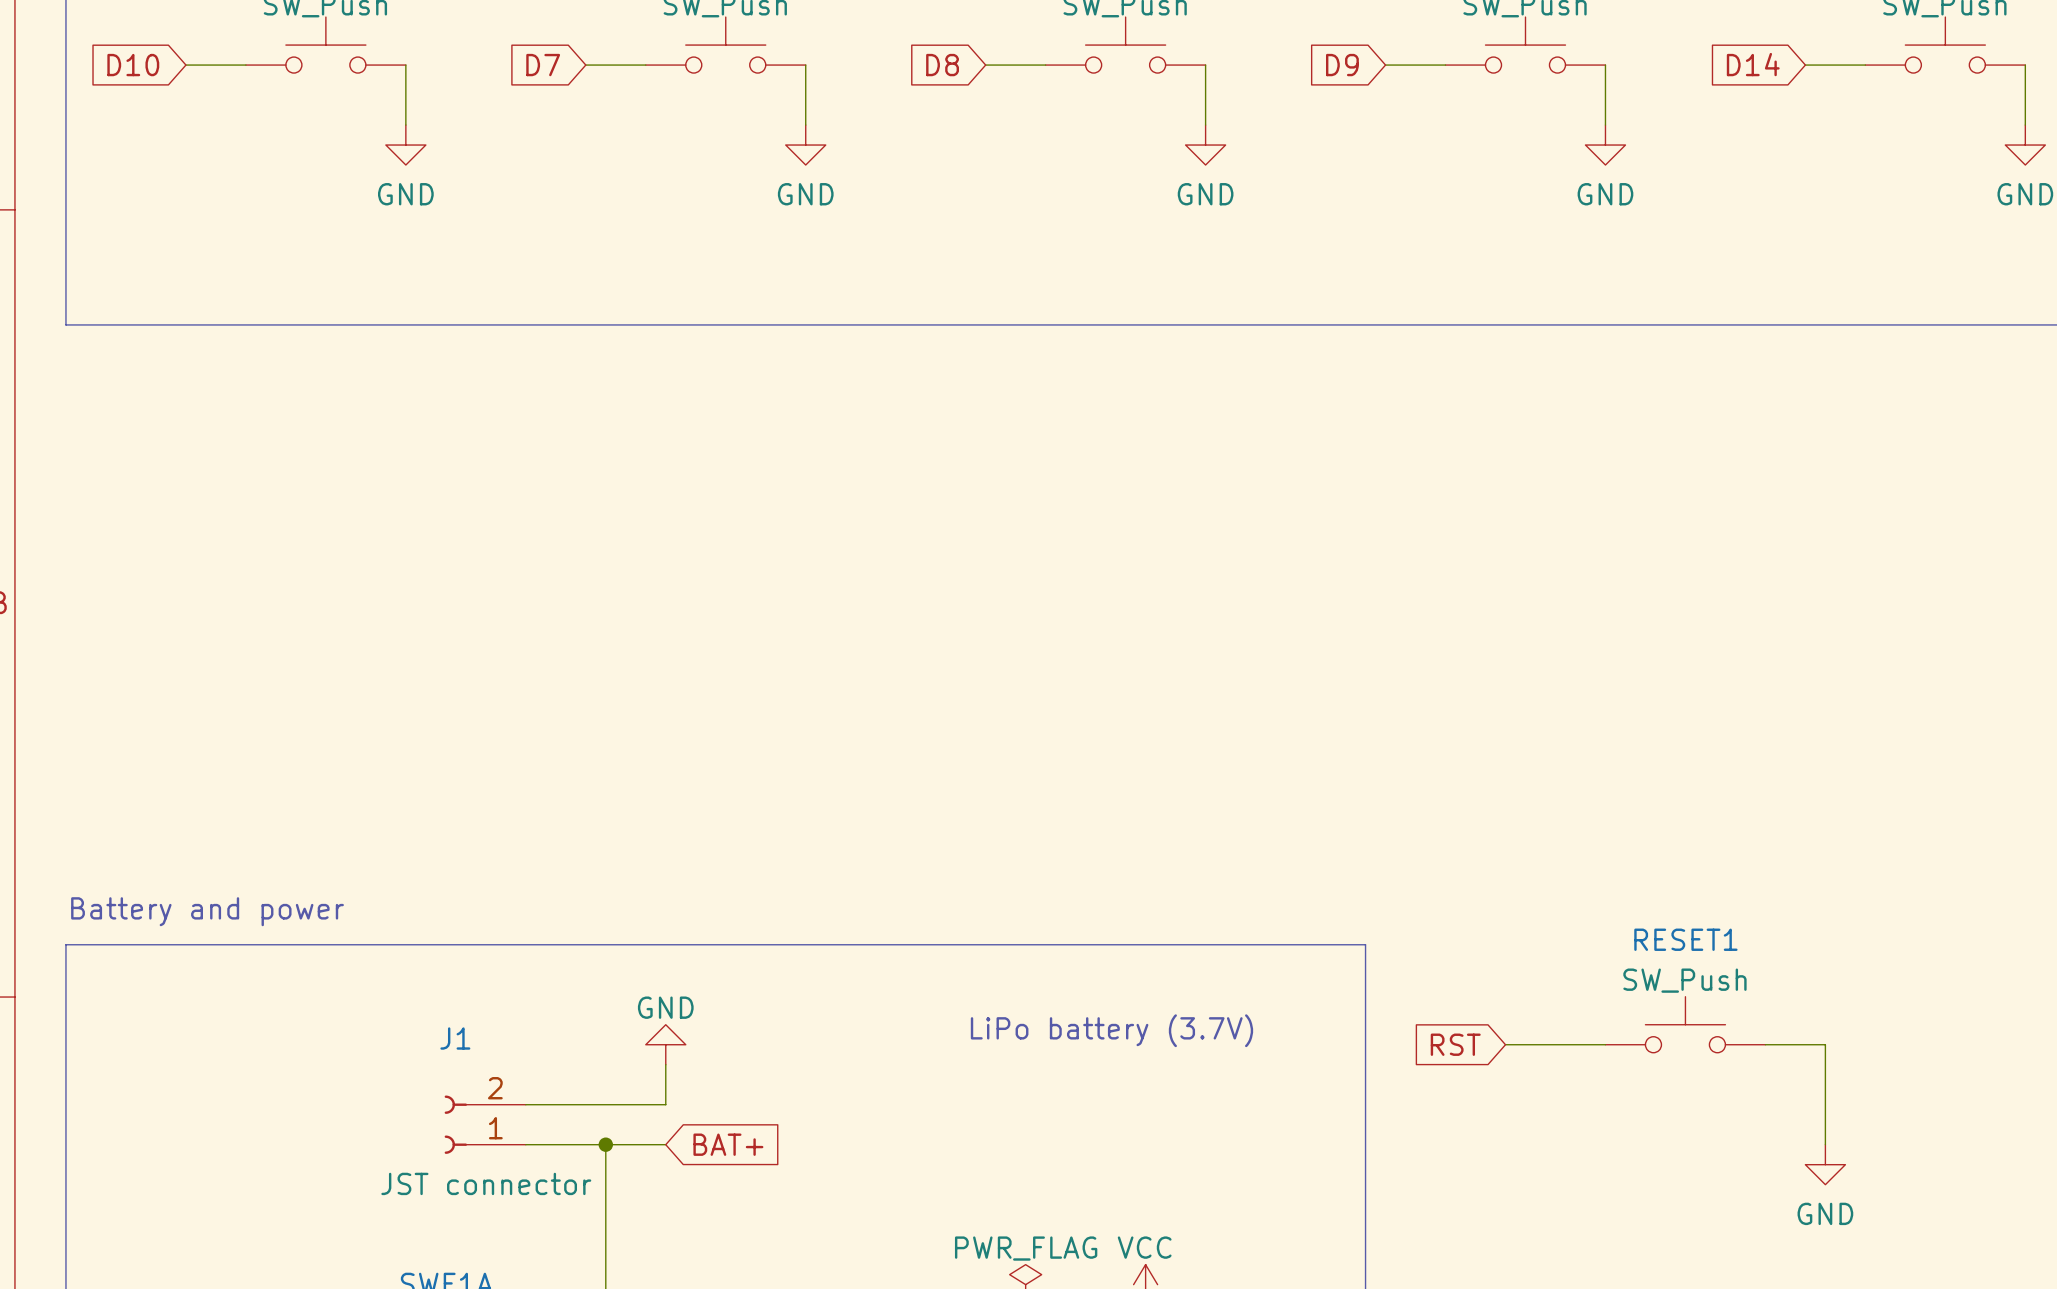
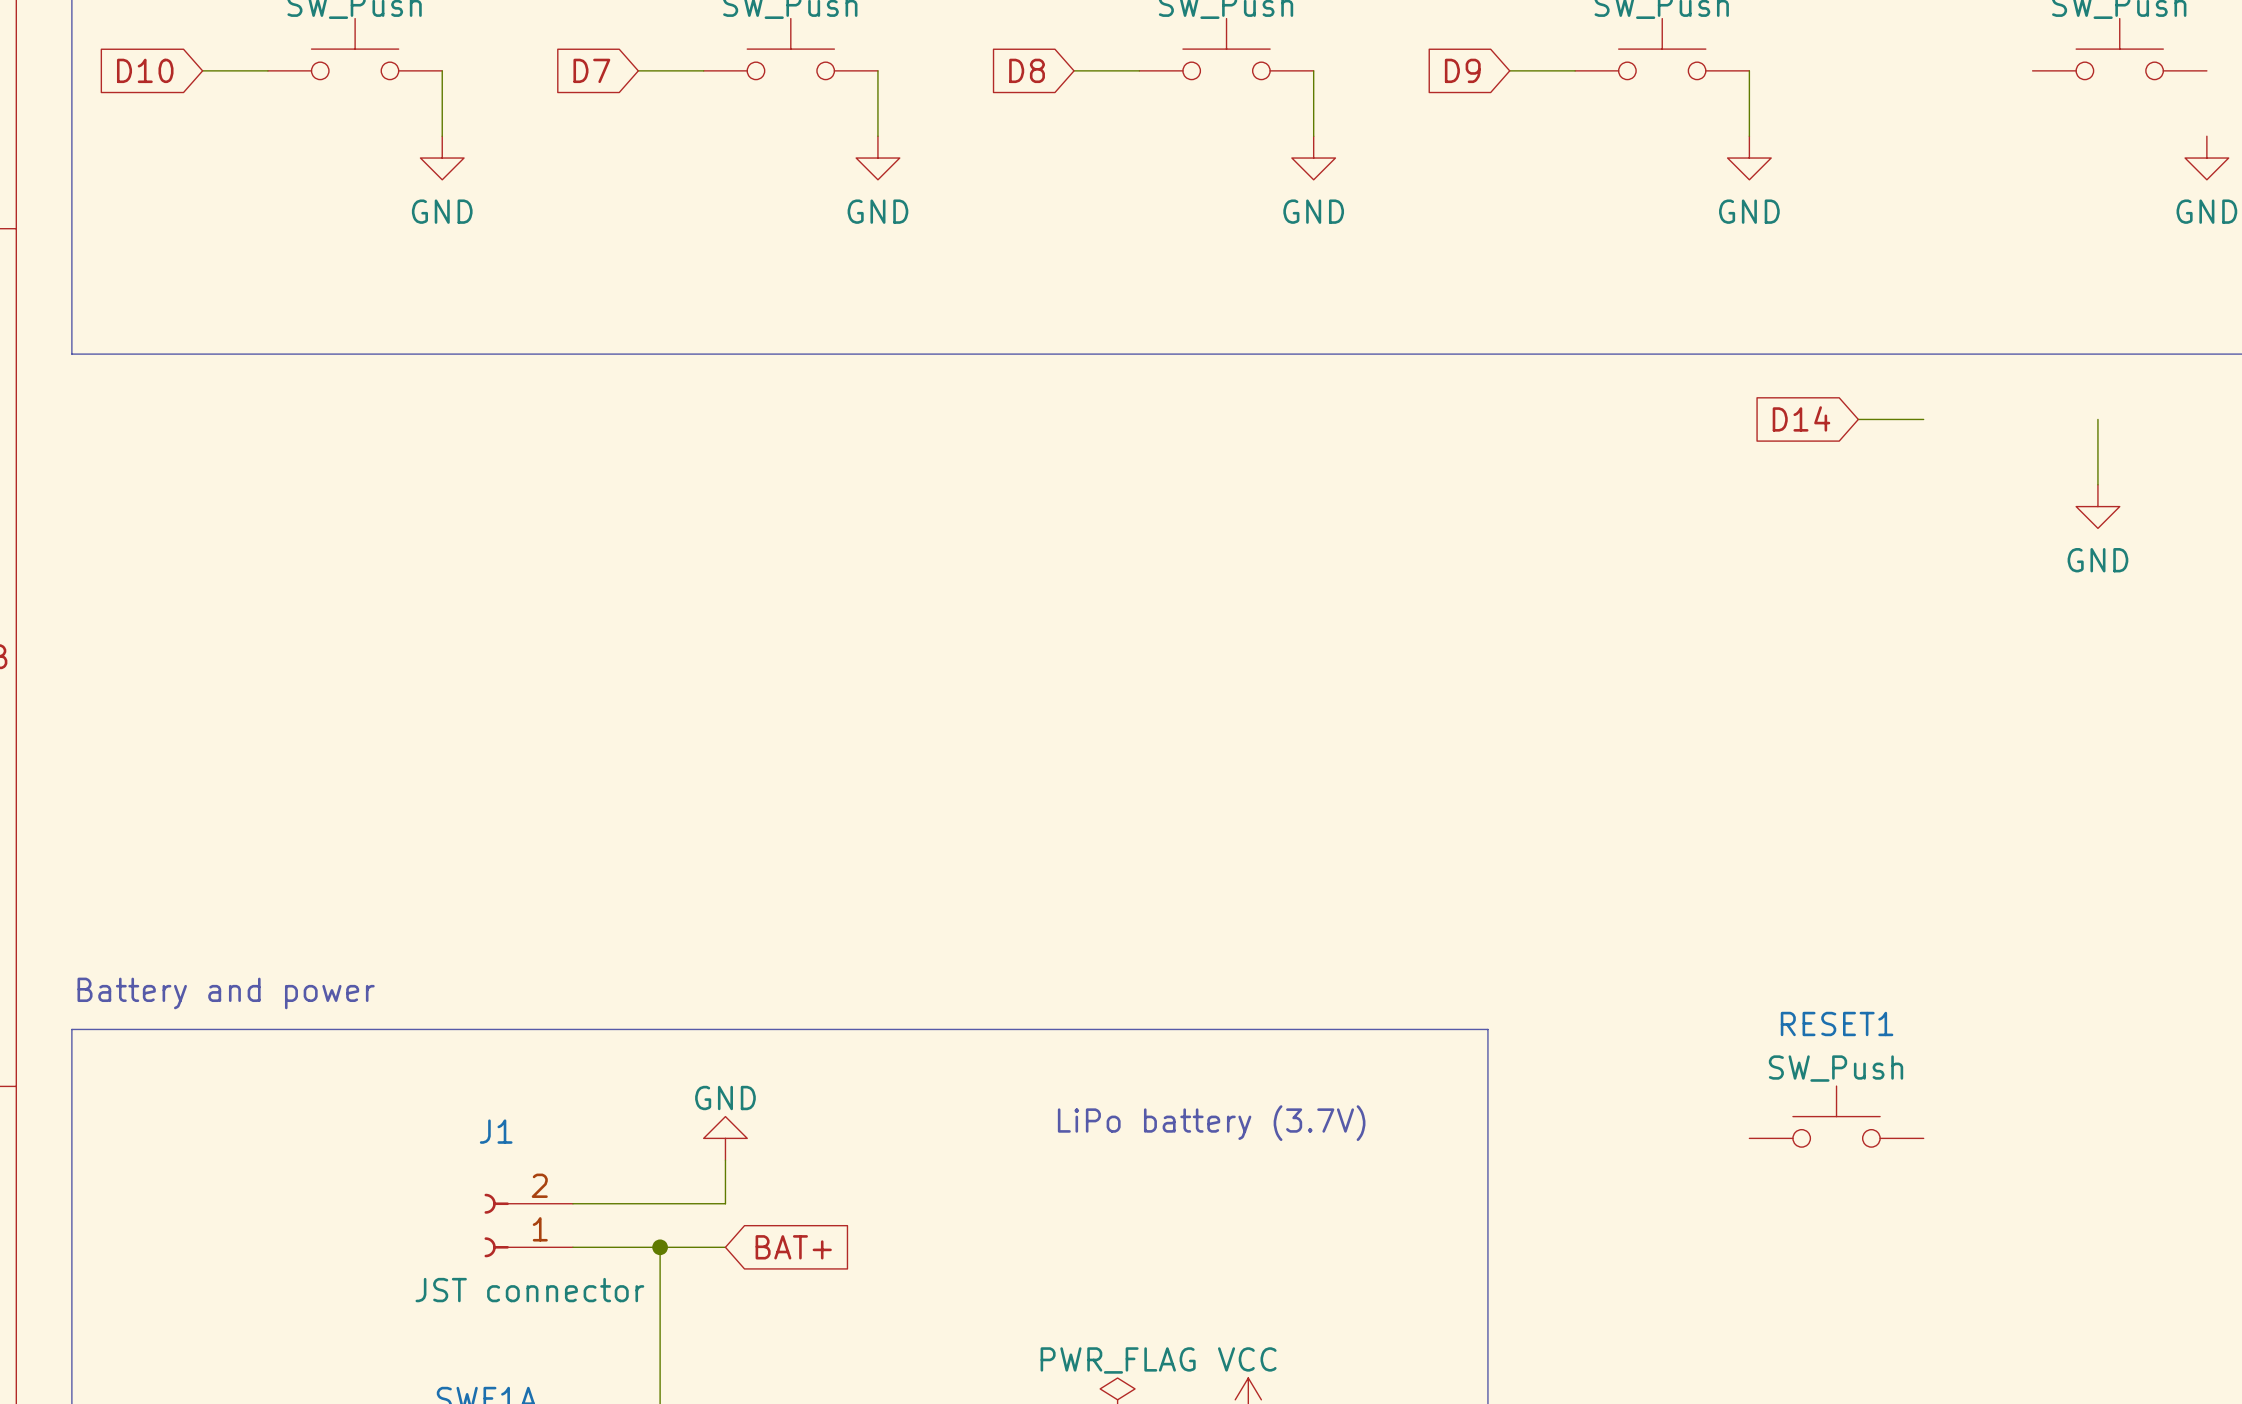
global label position: D14 (1753, 64) -> D14 (1801, 418)
wire: (1805, 65) (1865, 65) -> (1858, 419) (1923, 419)
wire: (2025, 65) (2025, 125) -> (2097, 419) (2097, 484)
power symbol: none -> GND (2097, 506)
global label: RST (1455, 1044) -> none
wire: (1505, 1044) (1605, 1044) -> none
wire: (1765, 1044) (1825, 1044) (1825, 1144) -> none
power symbol: GND (1825, 1164) -> none

